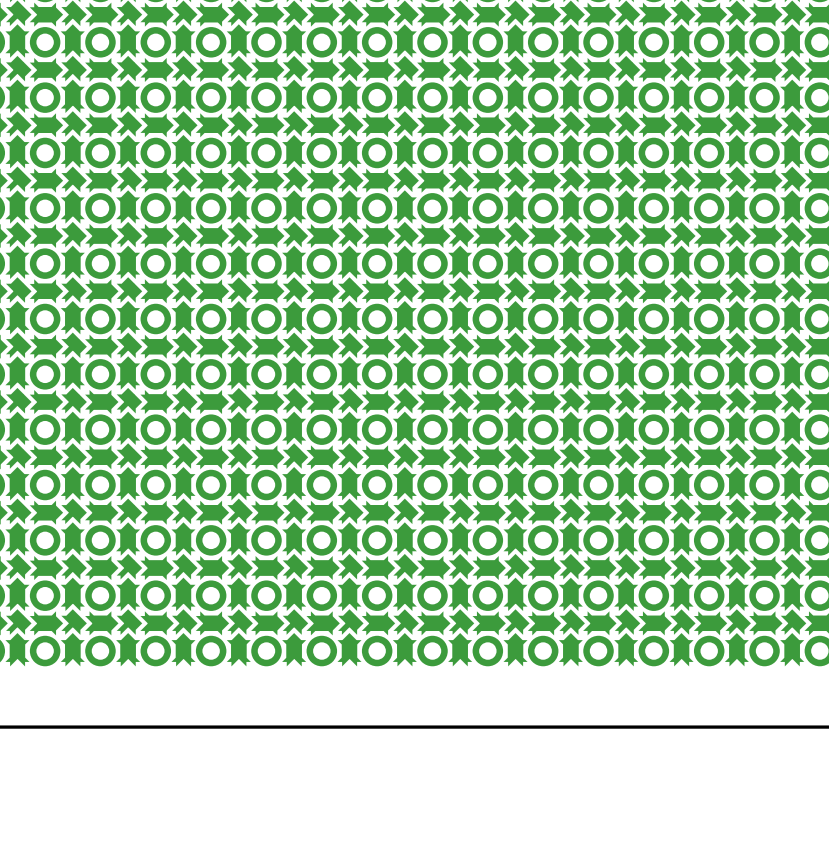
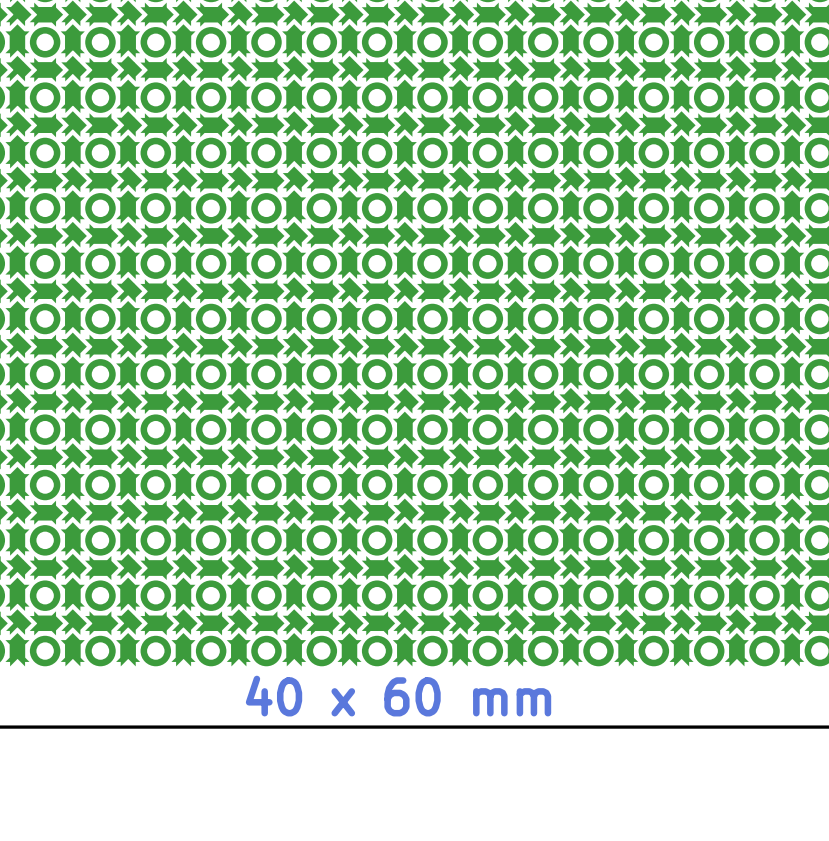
text: none -> 40 x 60 mm (398, 696)

